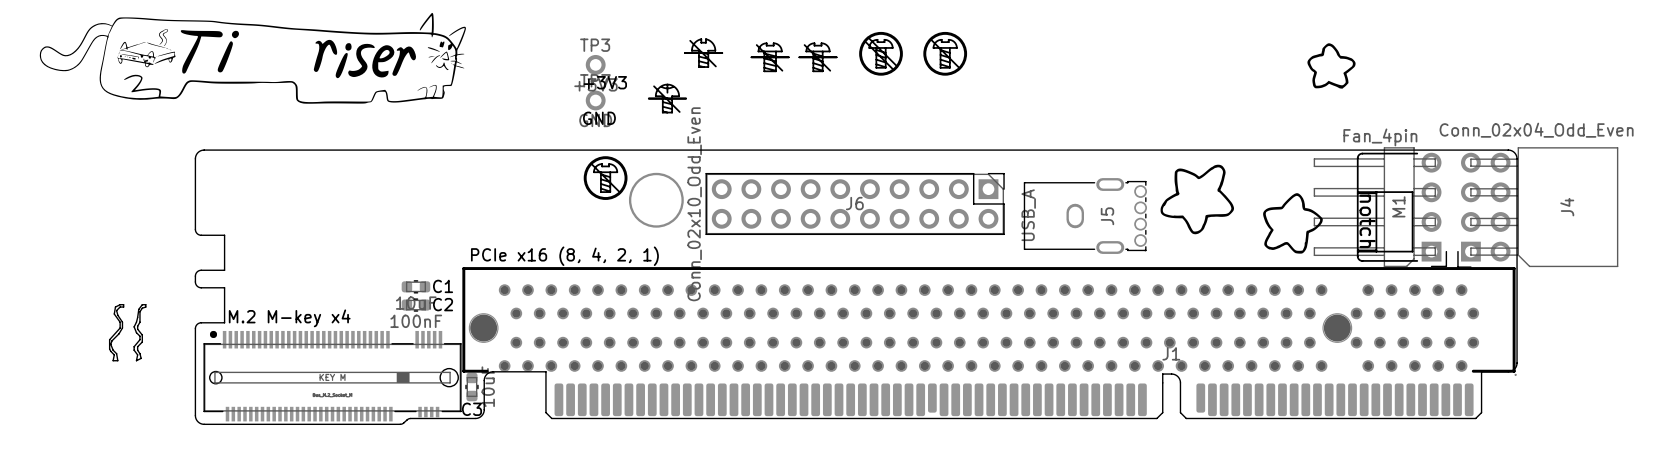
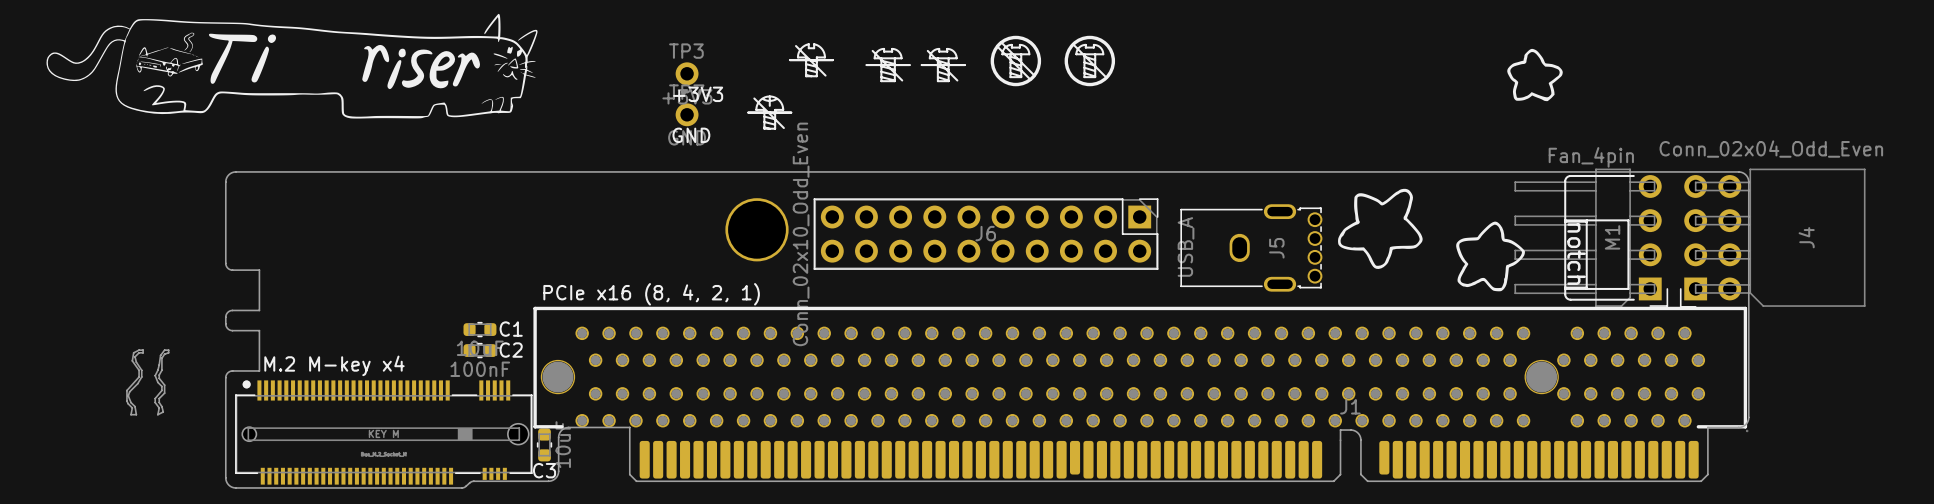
drawing: [583, 156, 628, 200] -> none
line: (591, 163) (620, 192) -> none
line: (602, 164) (602, 166) (612, 164) (617, 172) (593, 172) (596, 166) (602, 164) -> none
line: (600, 172) (600, 192) (610, 192) (610, 172) -> none
line: (600, 174) (610, 177) -> none
line: (600, 179) (610, 182) -> none
line: (600, 183) (610, 186) -> none
line: (600, 188) (610, 191) -> none

